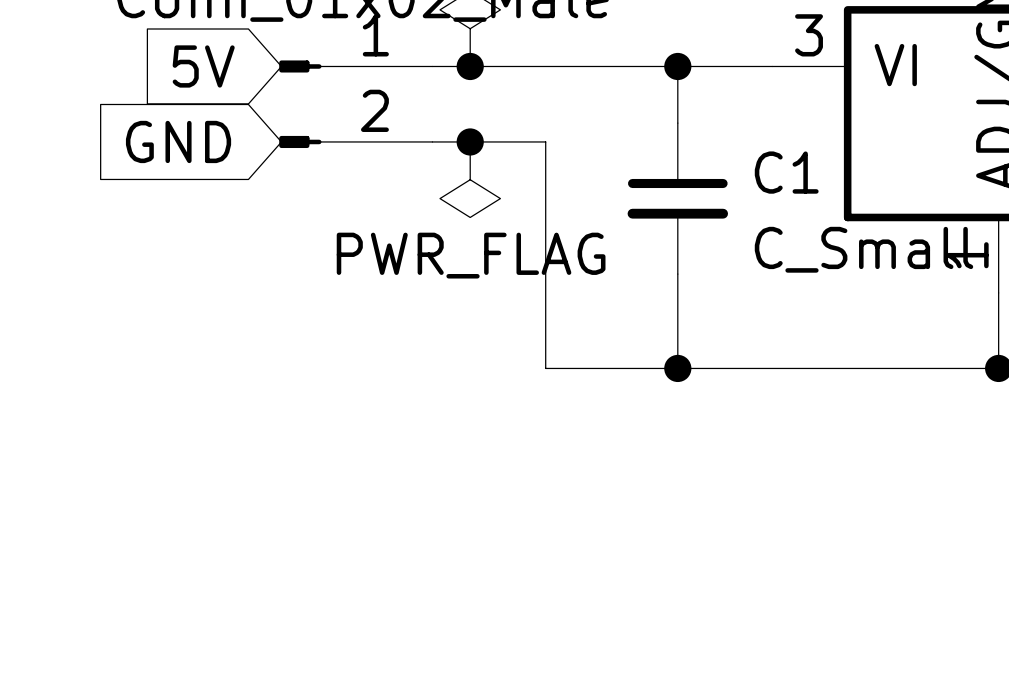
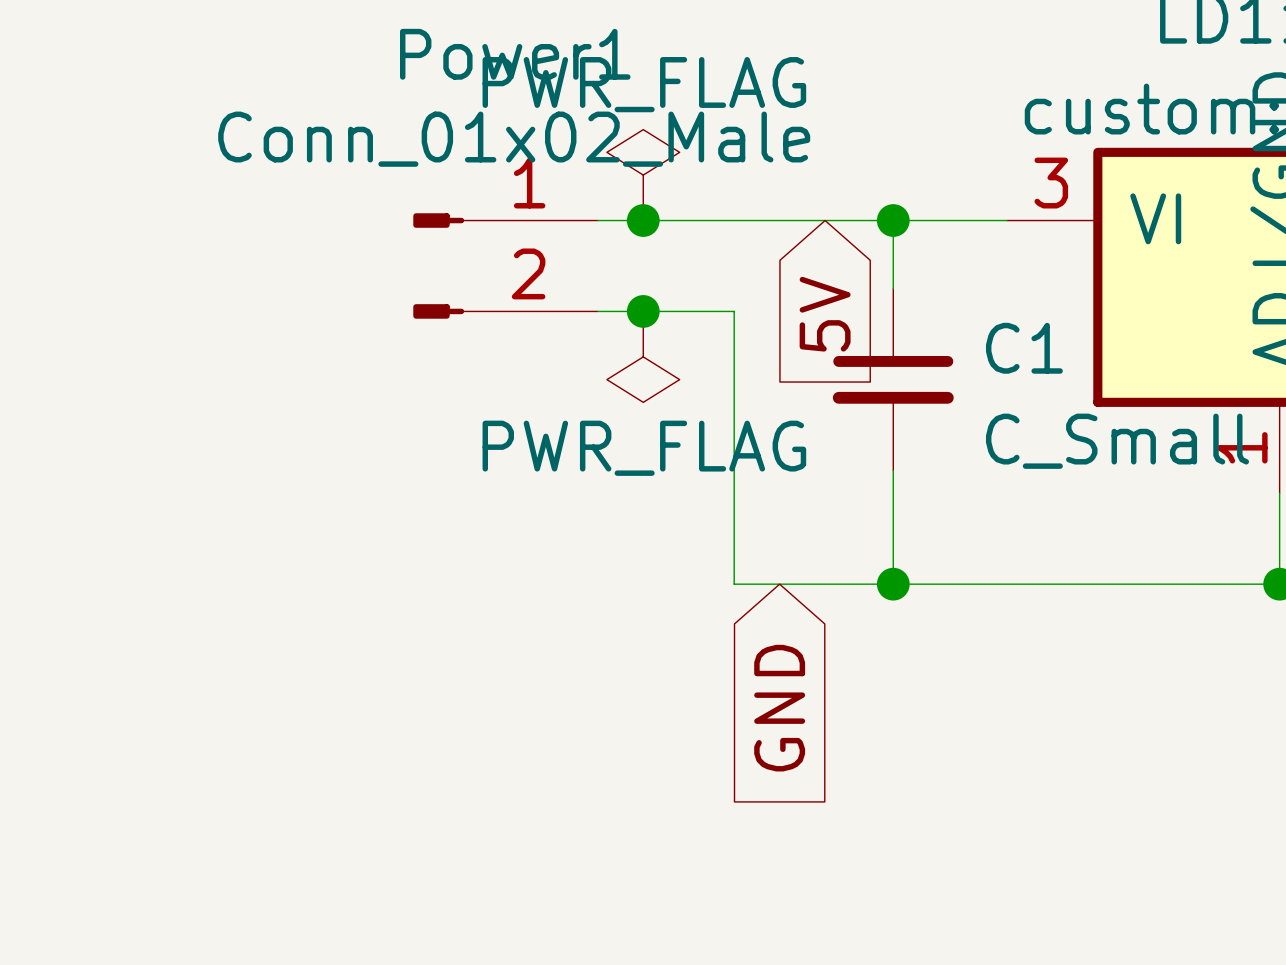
global label rotation: 0° (203, 66) -> 90° counterclockwise (825, 314)
global label position: 5V (203, 66) -> 5V (825, 314)
global label rotation: 0° (178, 141) -> 90° counterclockwise (779, 708)
global label position: GND (178, 141) -> GND (779, 708)

